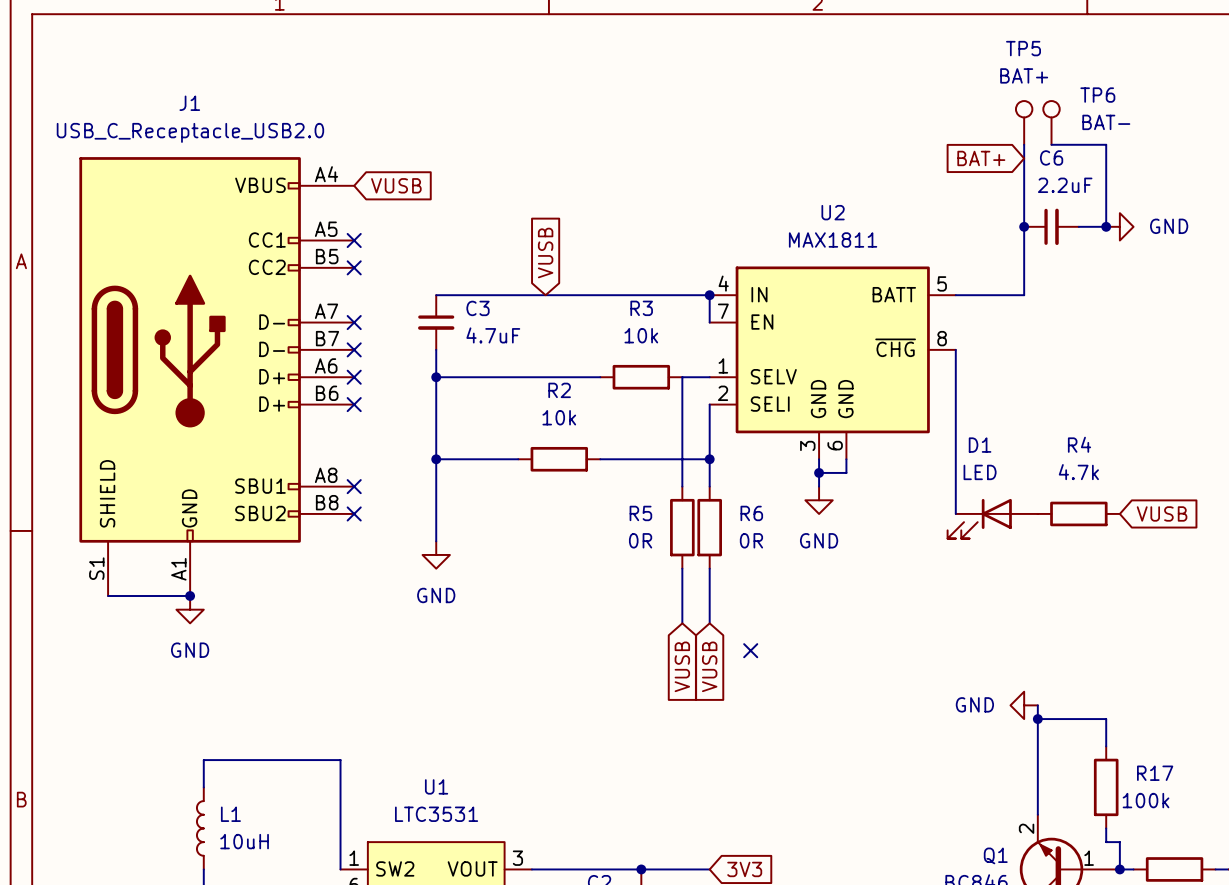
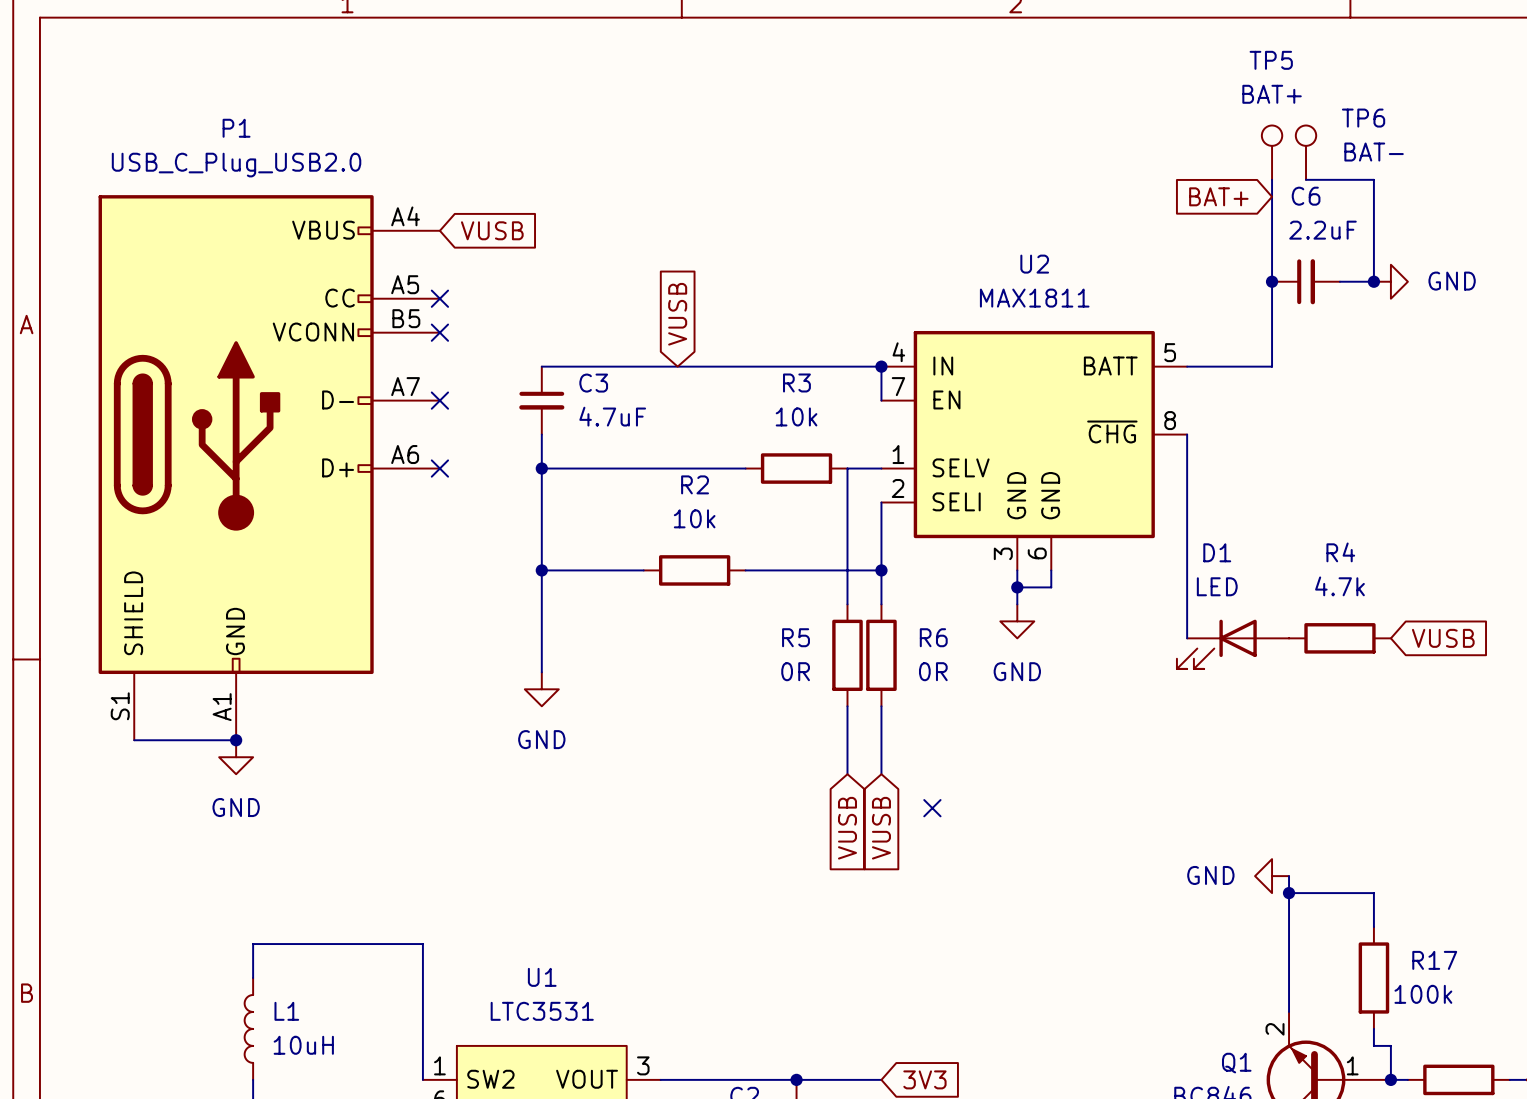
no-connect mark: (354, 349) -> none
J1: USB_C_Receptacle_USB2.0 (216, 376) -> none
P1: none -> USB_C_Plug_USB2.0 (269, 467)
no-connect mark: (354, 404) -> none
no-connect mark: (354, 486) -> none
no-connect mark: (354, 513) -> none

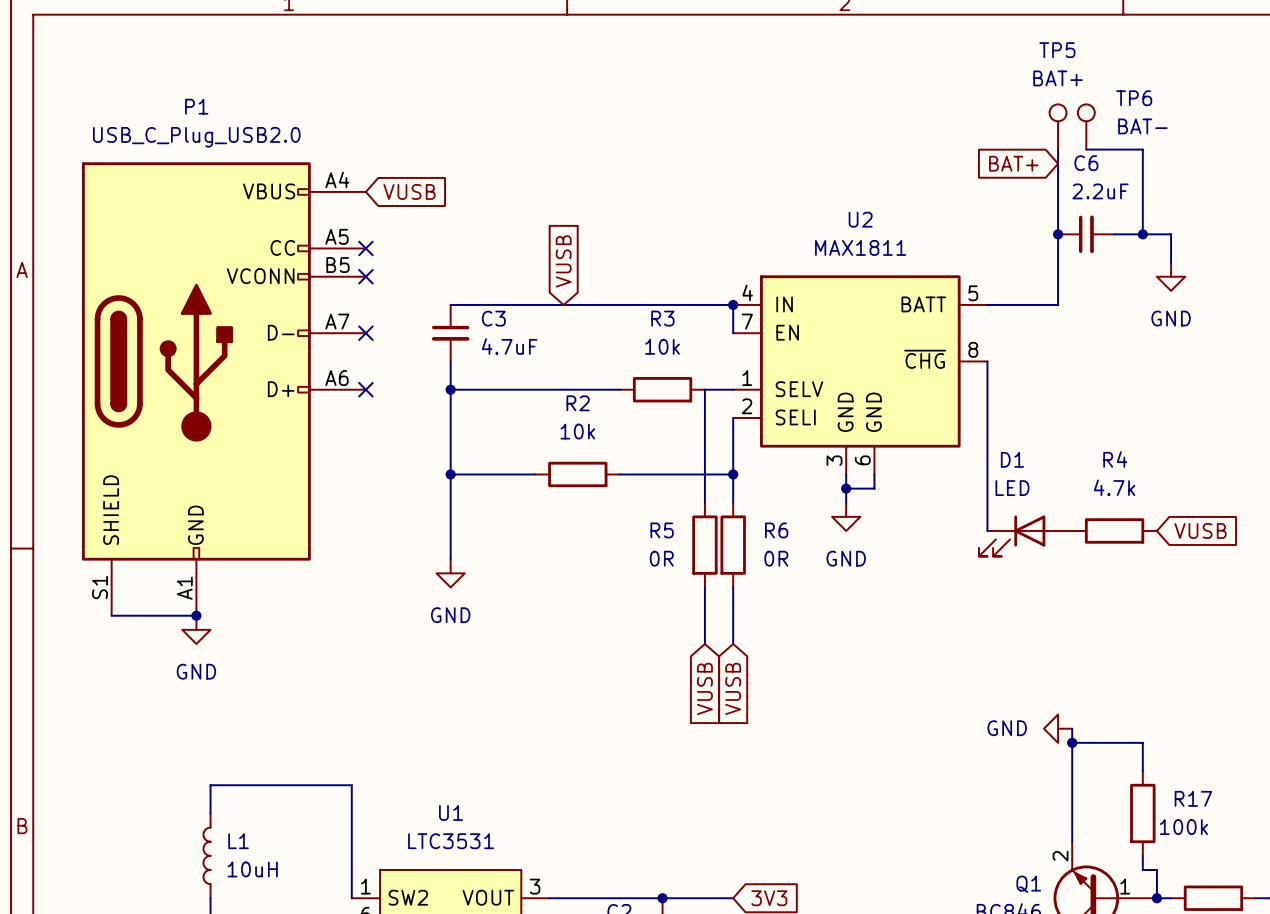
wire: none -> (1142, 234) (1171, 234) (1171, 262)
power symbol rotation: 0° (1390, 281) -> 90° clockwise (1171, 276)
power symbol position: GND (1390, 281) -> GND (1171, 276)
no-connect mark: (932, 808) -> none

